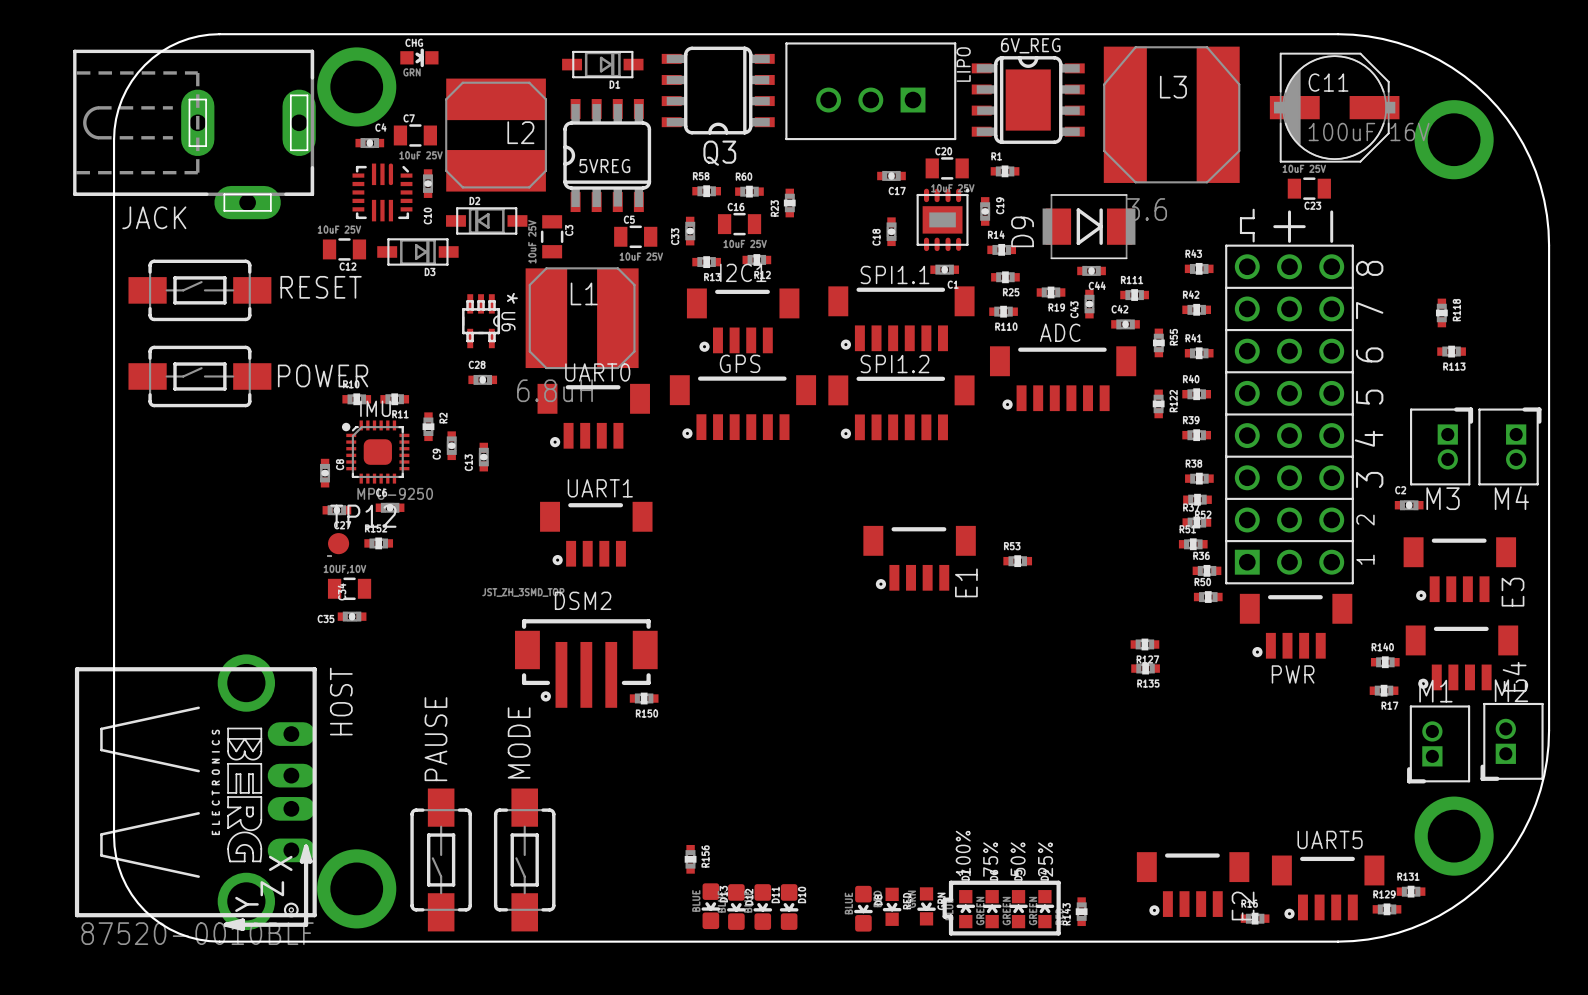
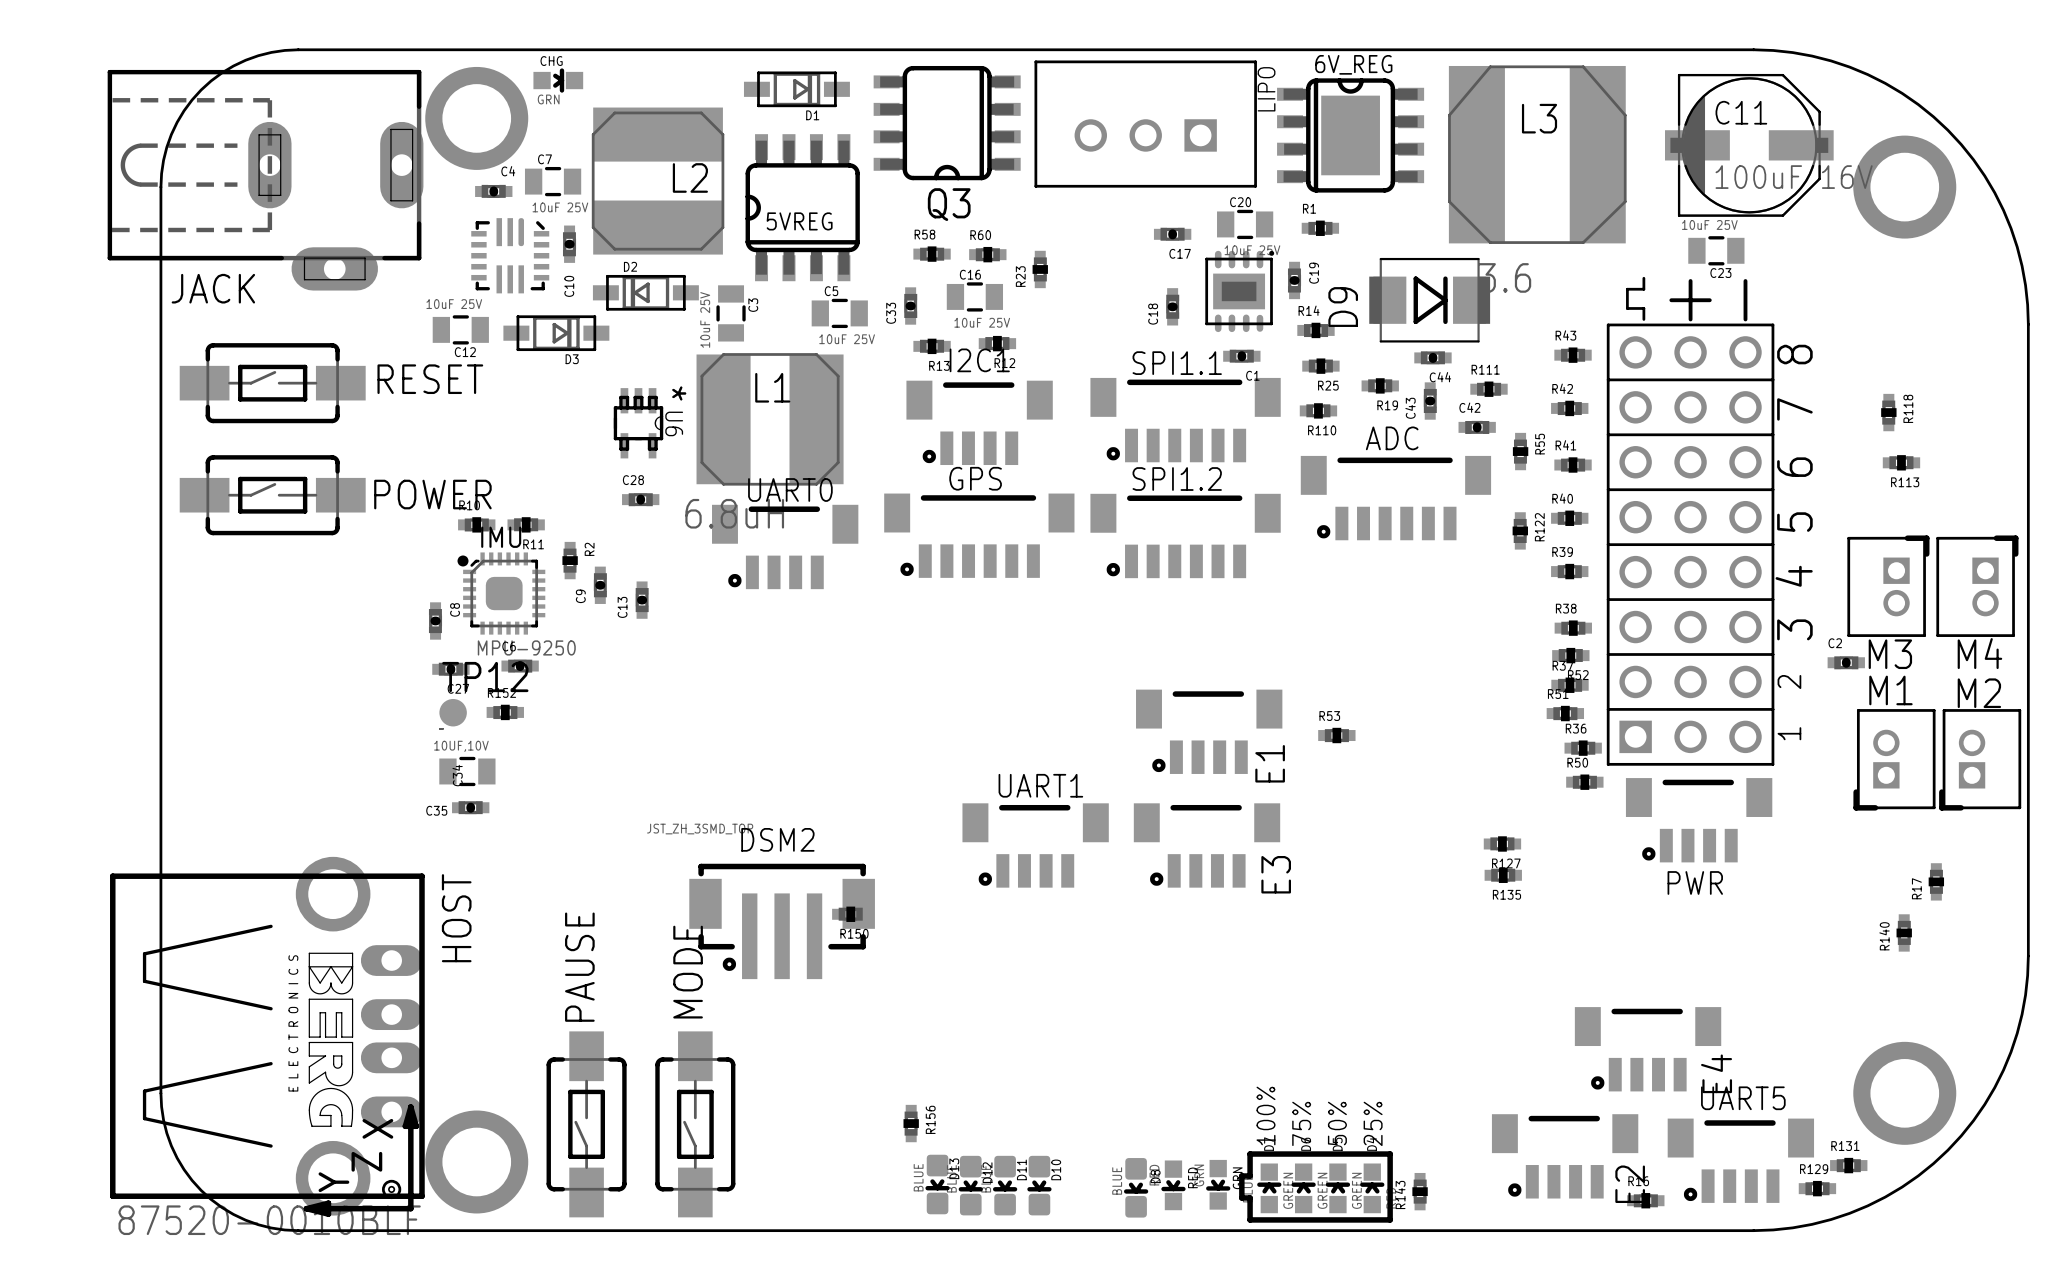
UART1 position: (596, 534) -> (1035, 845)
E3 position: (1459, 569) -> (1207, 845)
E4 position: (1461, 657) -> (1648, 1049)
R140 rotation: 0° (1385, 662) -> 90° clockwise (1904, 932)
R140 position: (1385, 662) -> (1904, 932)
DSM2 position: (586, 663) -> (782, 921)
R17 rotation: 0° (1384, 690) -> 90° clockwise (1936, 881)
R17 position: (1384, 690) -> (1936, 881)
M2 position: (1512, 741) -> (1980, 759)
M1 position: (1438, 744) -> (1894, 759)

